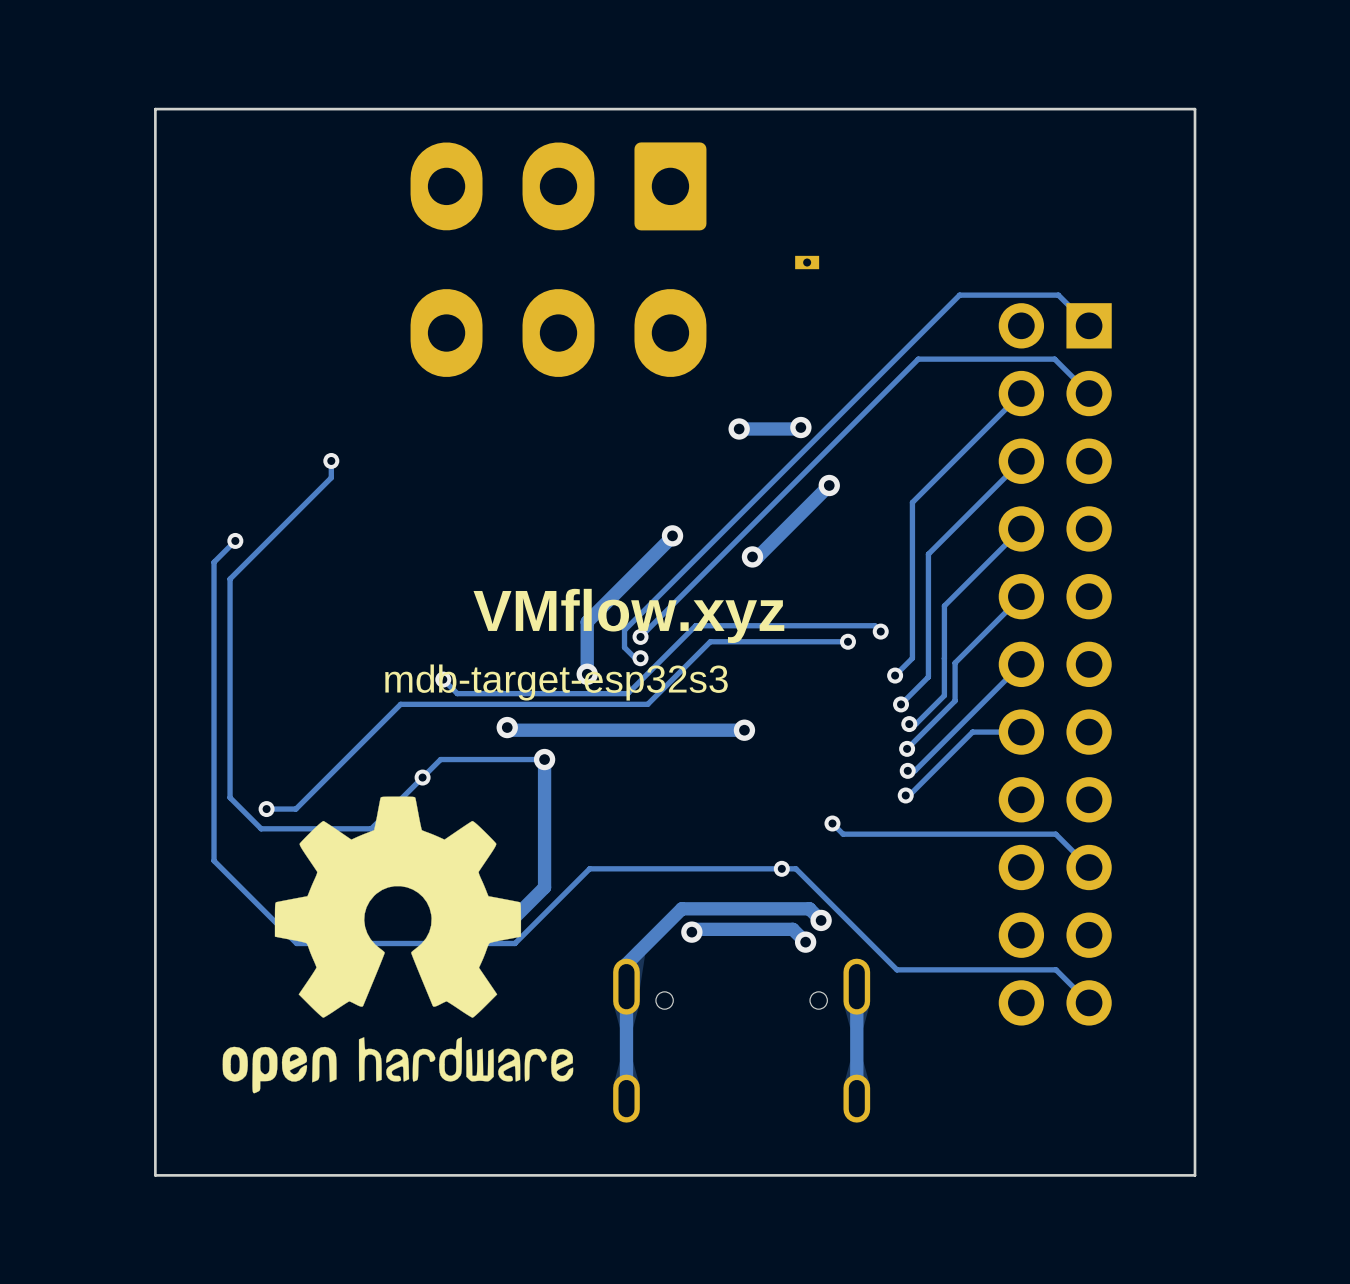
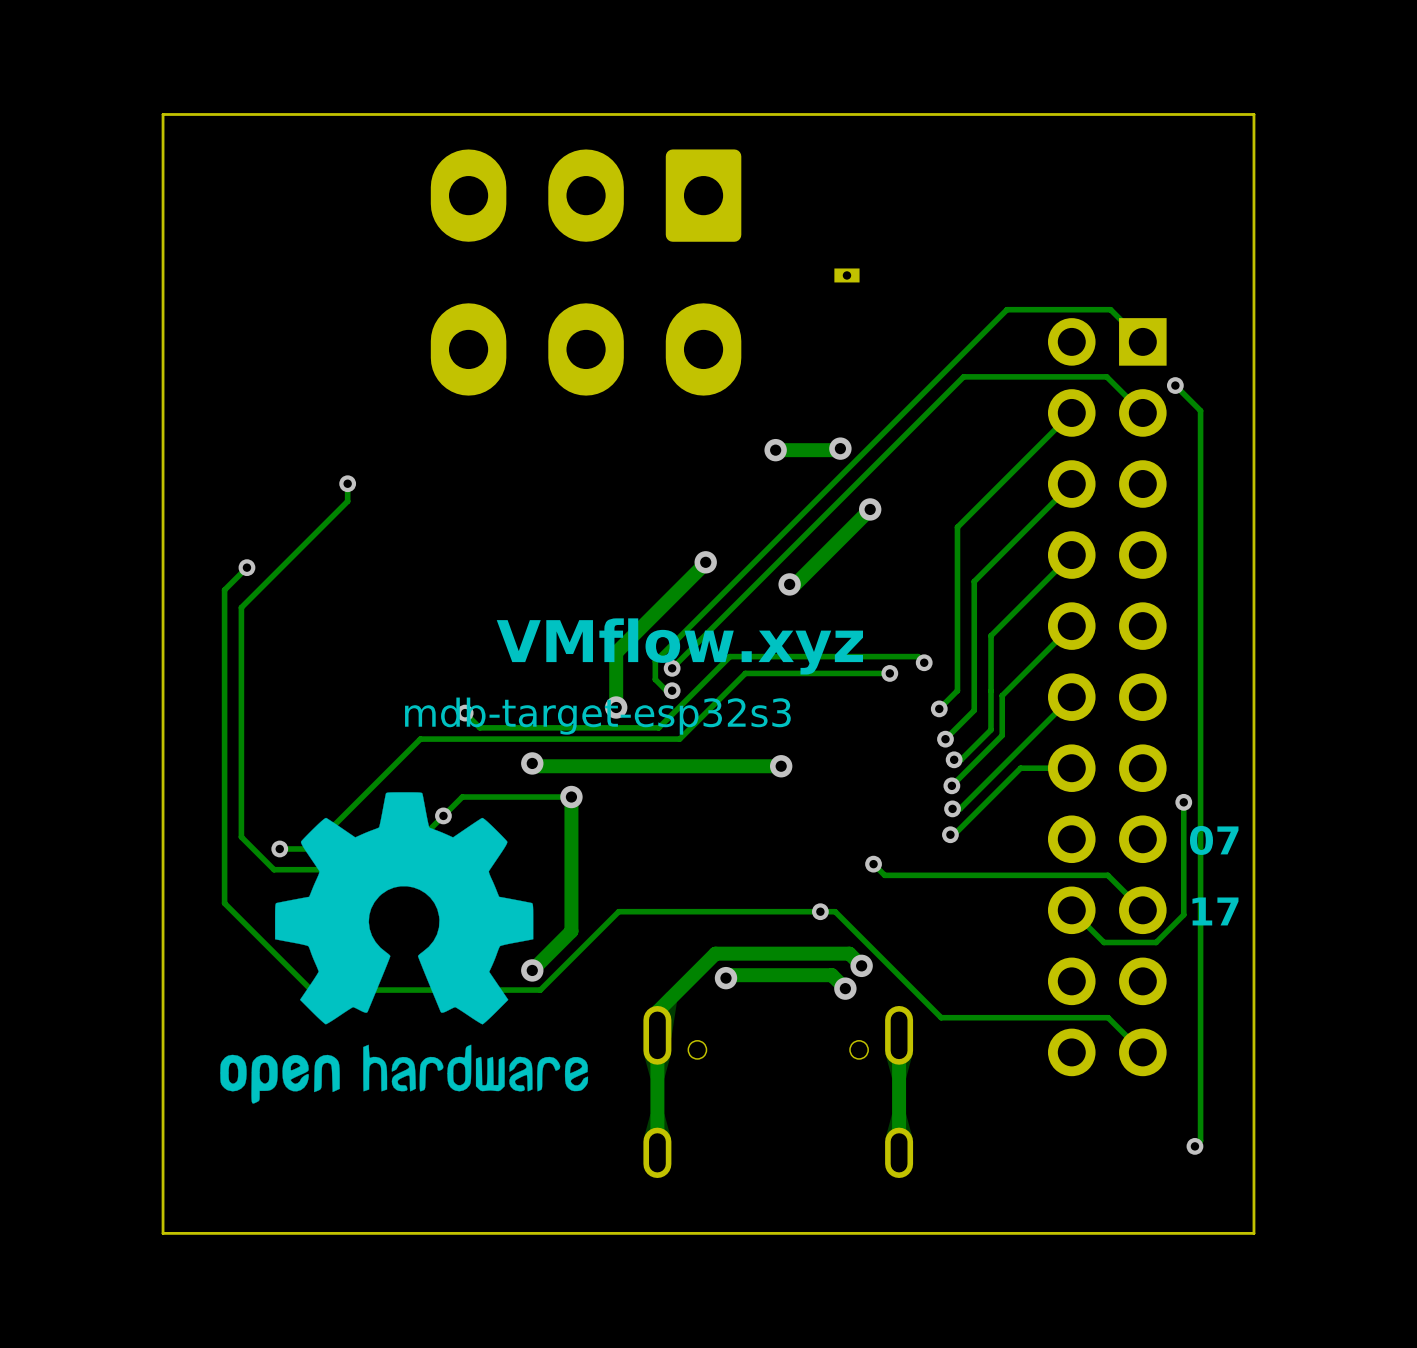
track: none -> (1175, 385) (1200, 410) (1200, 1140) (1194, 1146)
via: none -> (1175, 385)
track: none -> (1183, 802) (1183, 914) (1156, 942) (1103, 942) (1071, 910)
via: none -> (1183, 802)
text: none -> 07 (1214, 840)
text: none -> 17 (1215, 911)
drawing position: (397, 944) -> (404, 947)
via: none -> (1194, 1146)

